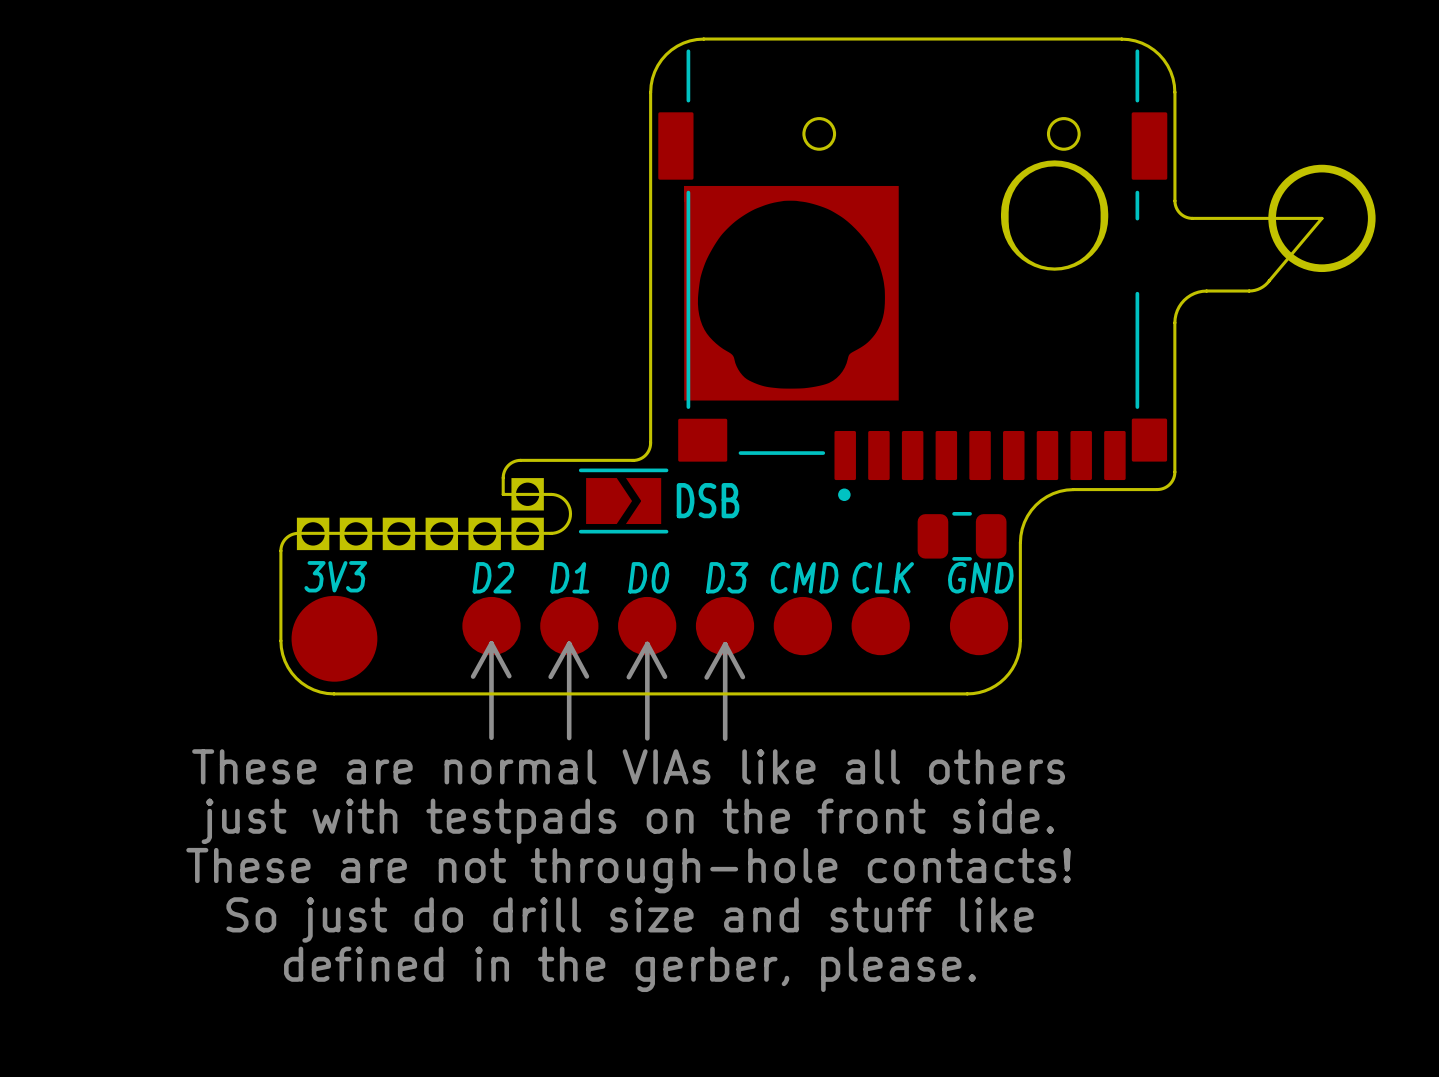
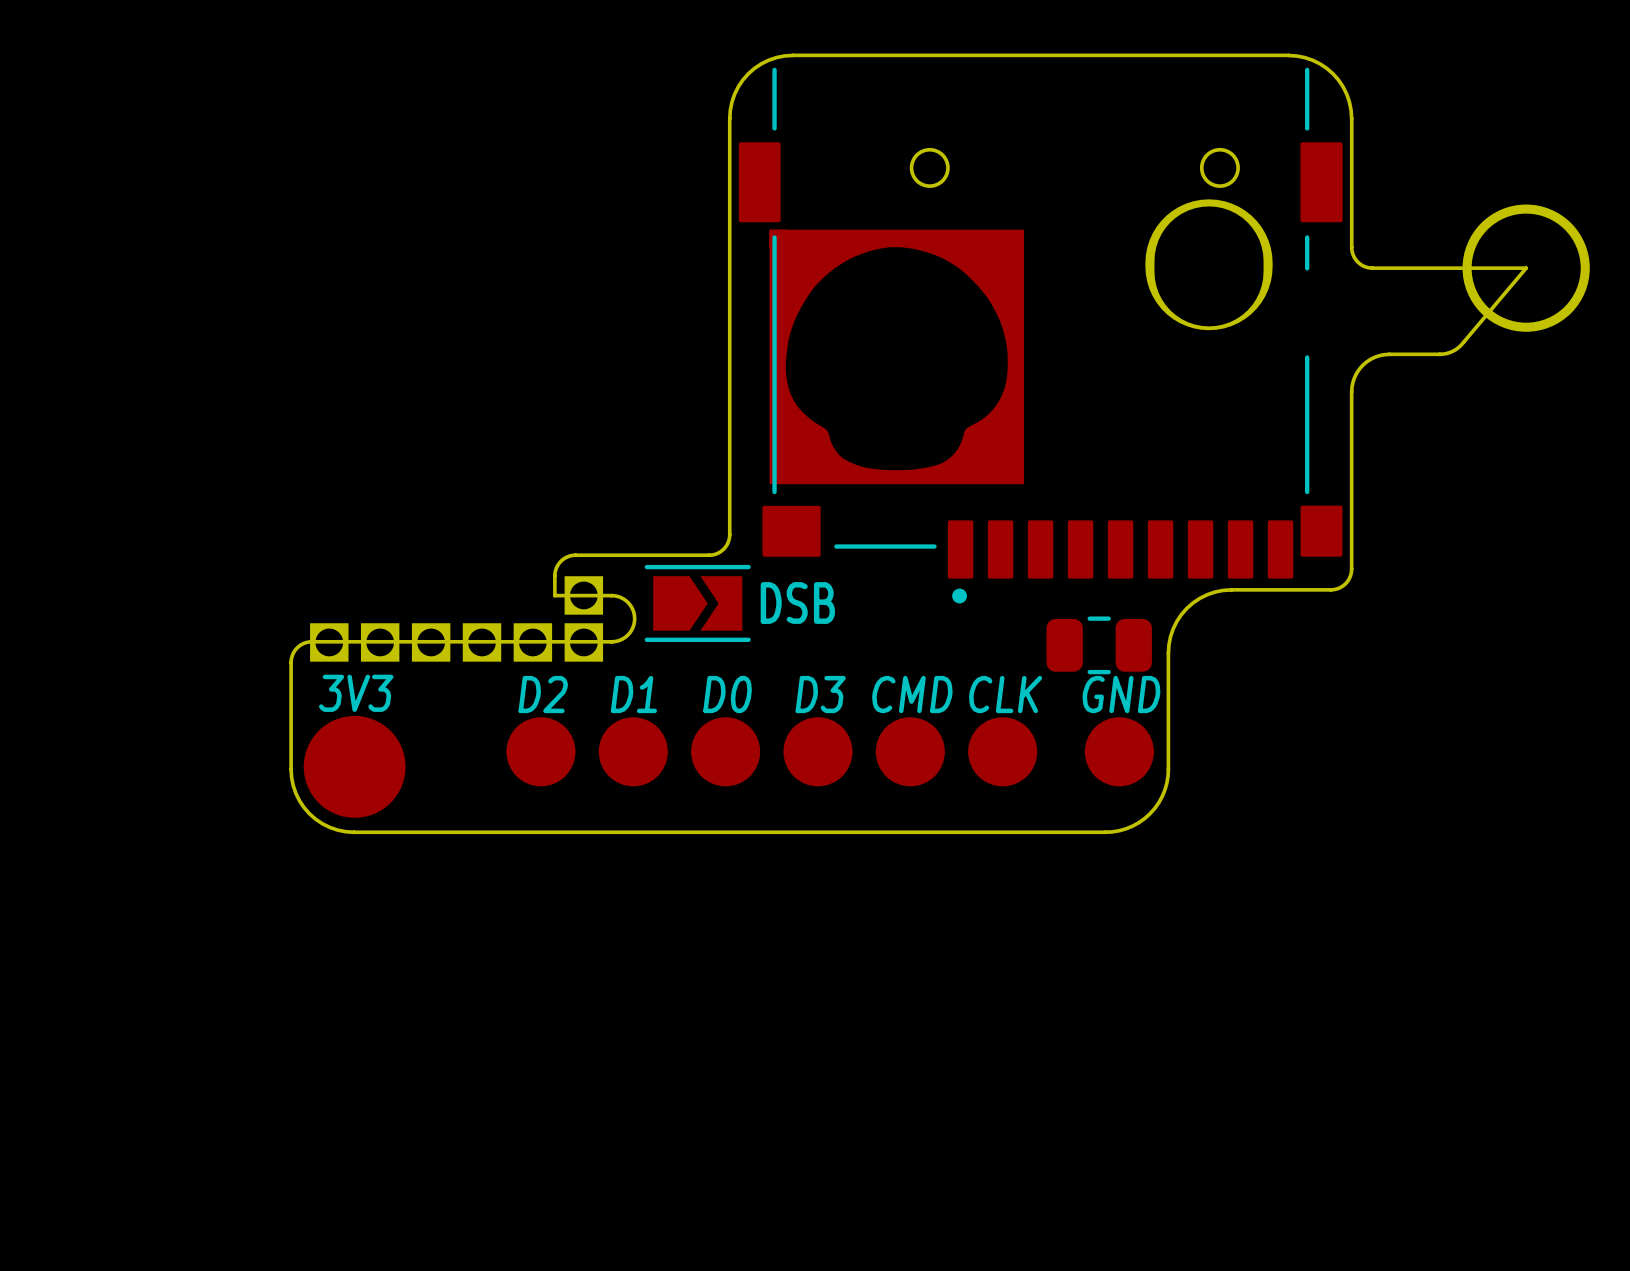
line: (491, 643) (491, 737) -> none
line: (491, 643) (473, 676) -> none
line: (491, 643) (509, 676) -> none
line: (569, 643) (586, 676) -> none
line: (569, 643) (550, 676) -> none
line: (569, 643) (569, 738) -> none
line: (647, 643) (628, 677) -> none
line: (647, 643) (665, 676) -> none
line: (647, 643) (647, 738) -> none
line: (725, 644) (742, 677) -> none
line: (725, 644) (725, 738) -> none
line: (725, 644) (706, 677) -> none
text: These are normal VIAs like all others (628, 766) -> none
text: just with testpads on the front side. (627, 821) -> none
text: These are not through-hole contacts! (628, 870) -> none
text: So just do drill size and stuff like (630, 919) -> none
text: defined in the gerber, please. (630, 969) -> none

